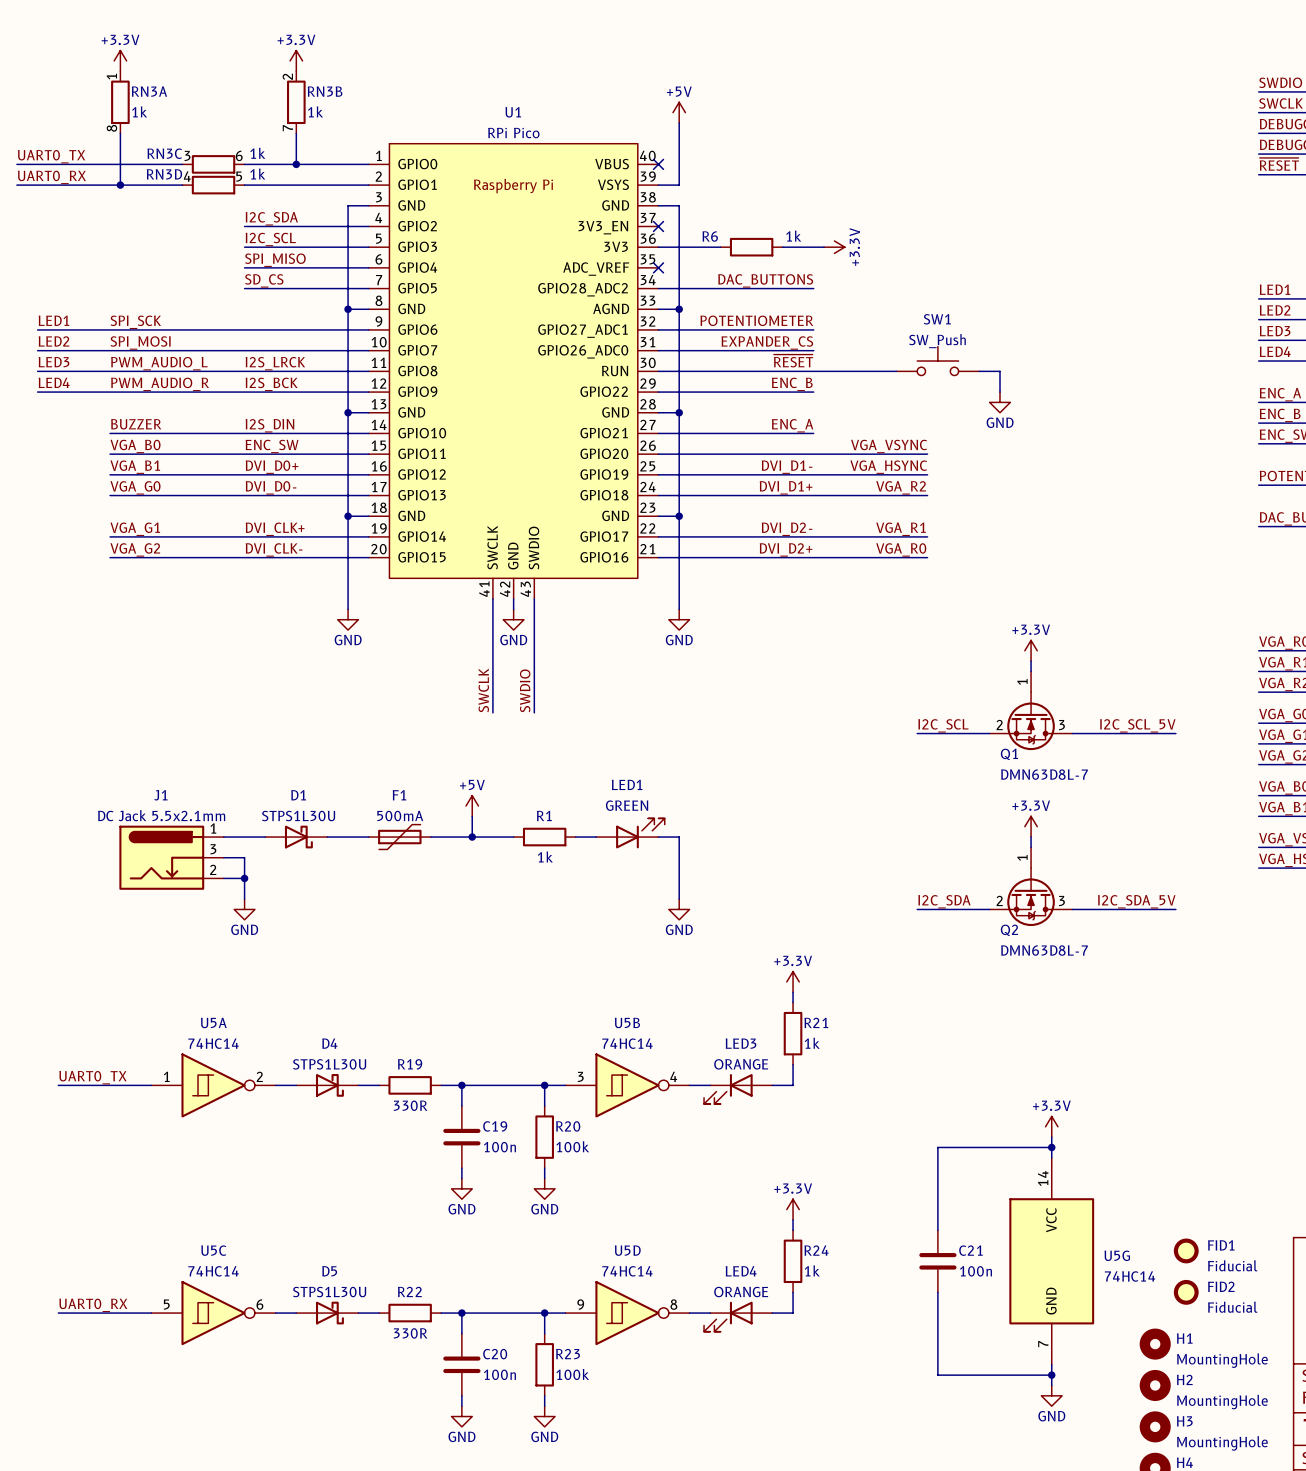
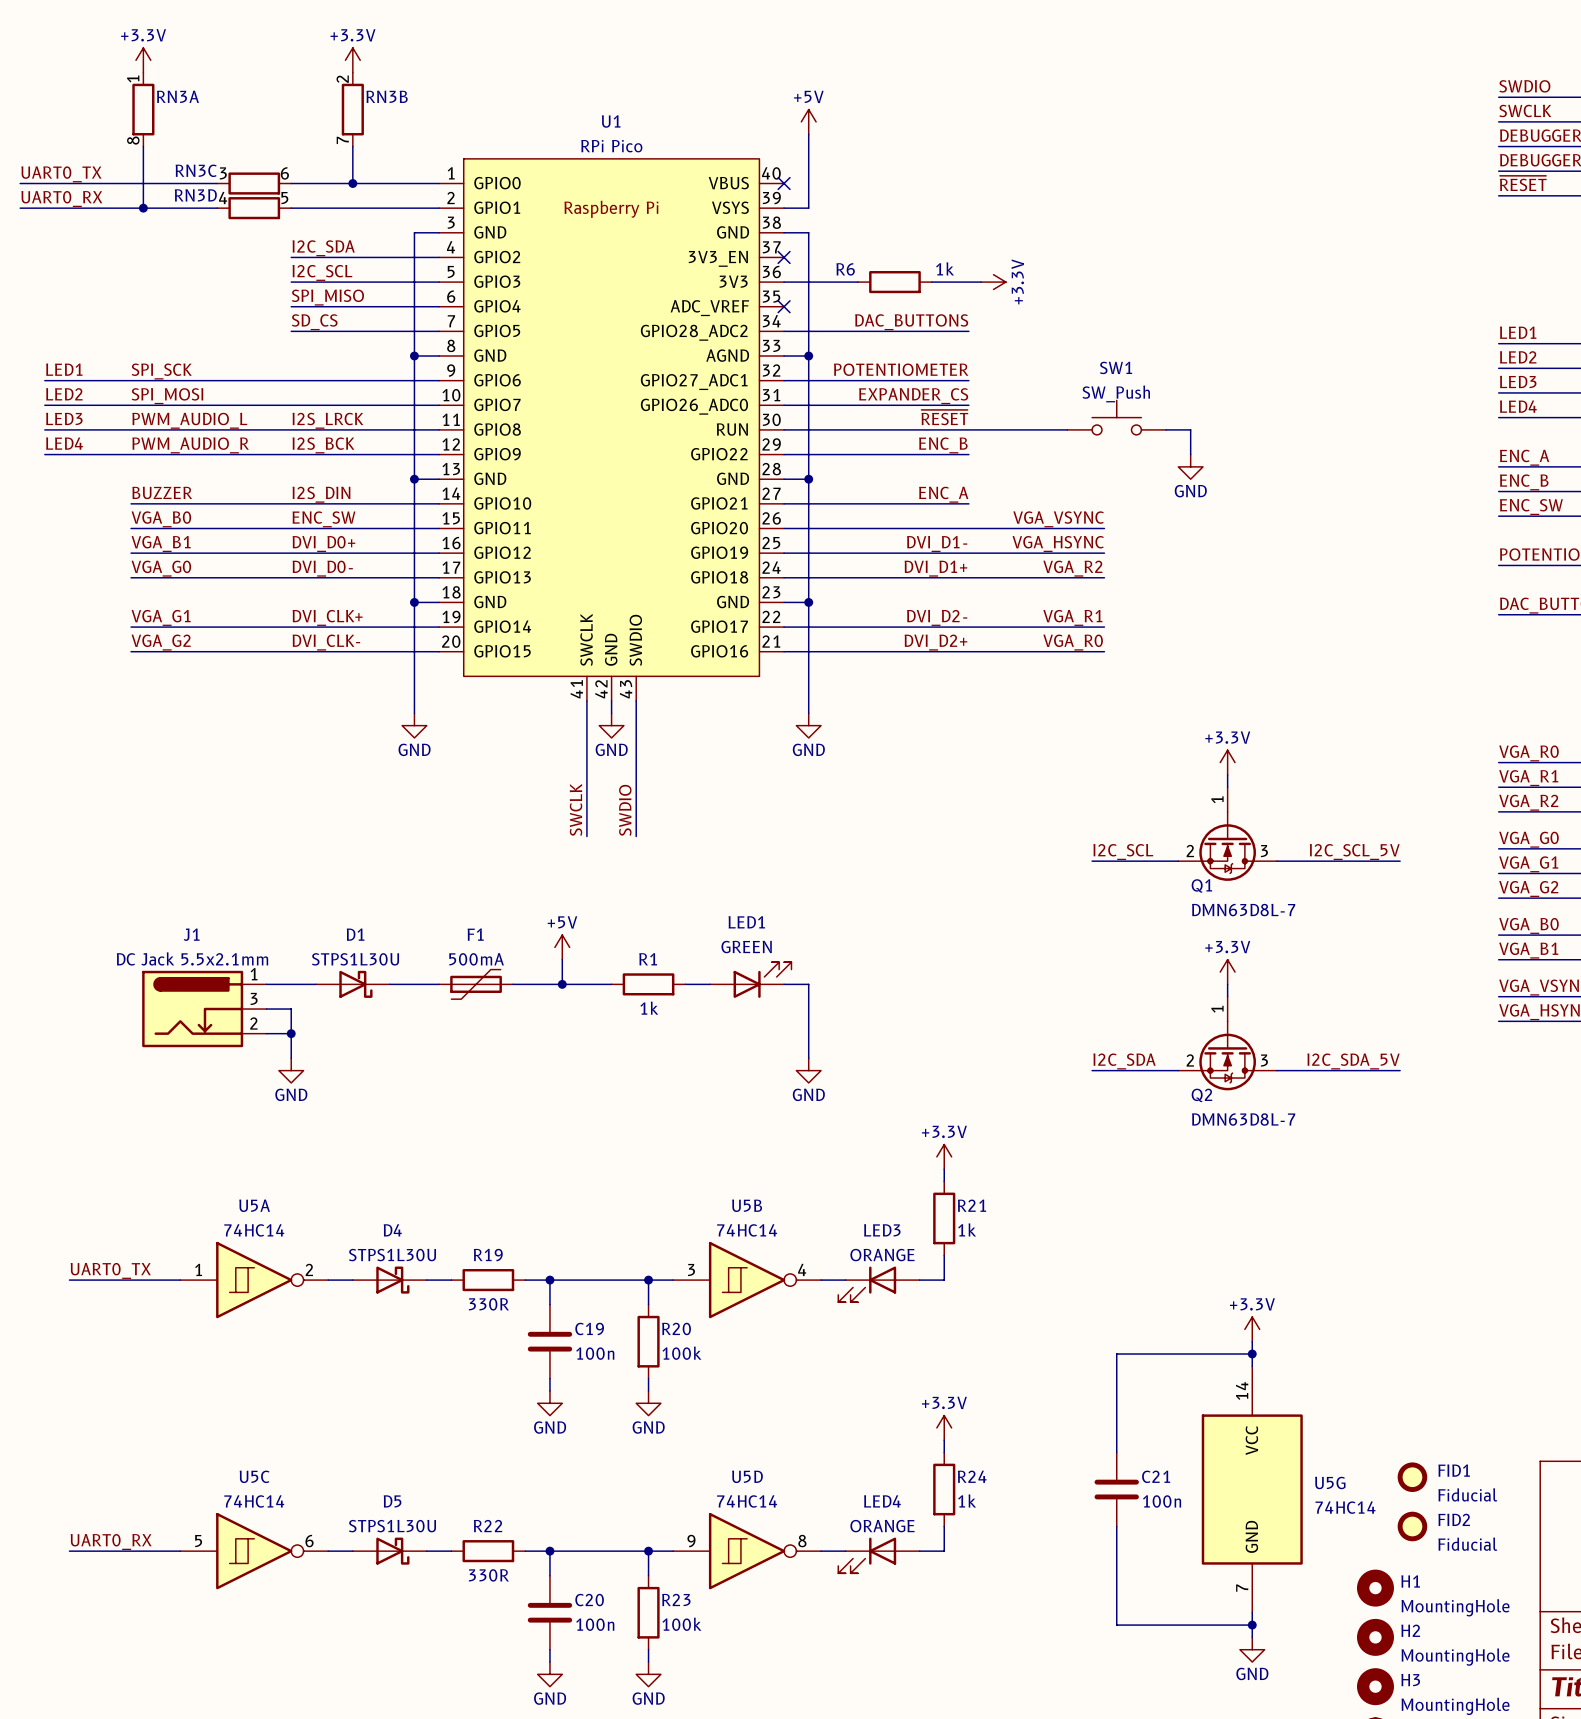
RN3A value: 1k (139, 111) -> none
RN3B value: 1k (315, 111) -> none
RN3C value: 1k (257, 153) -> none
RN3D value: 1k (257, 174) -> none

